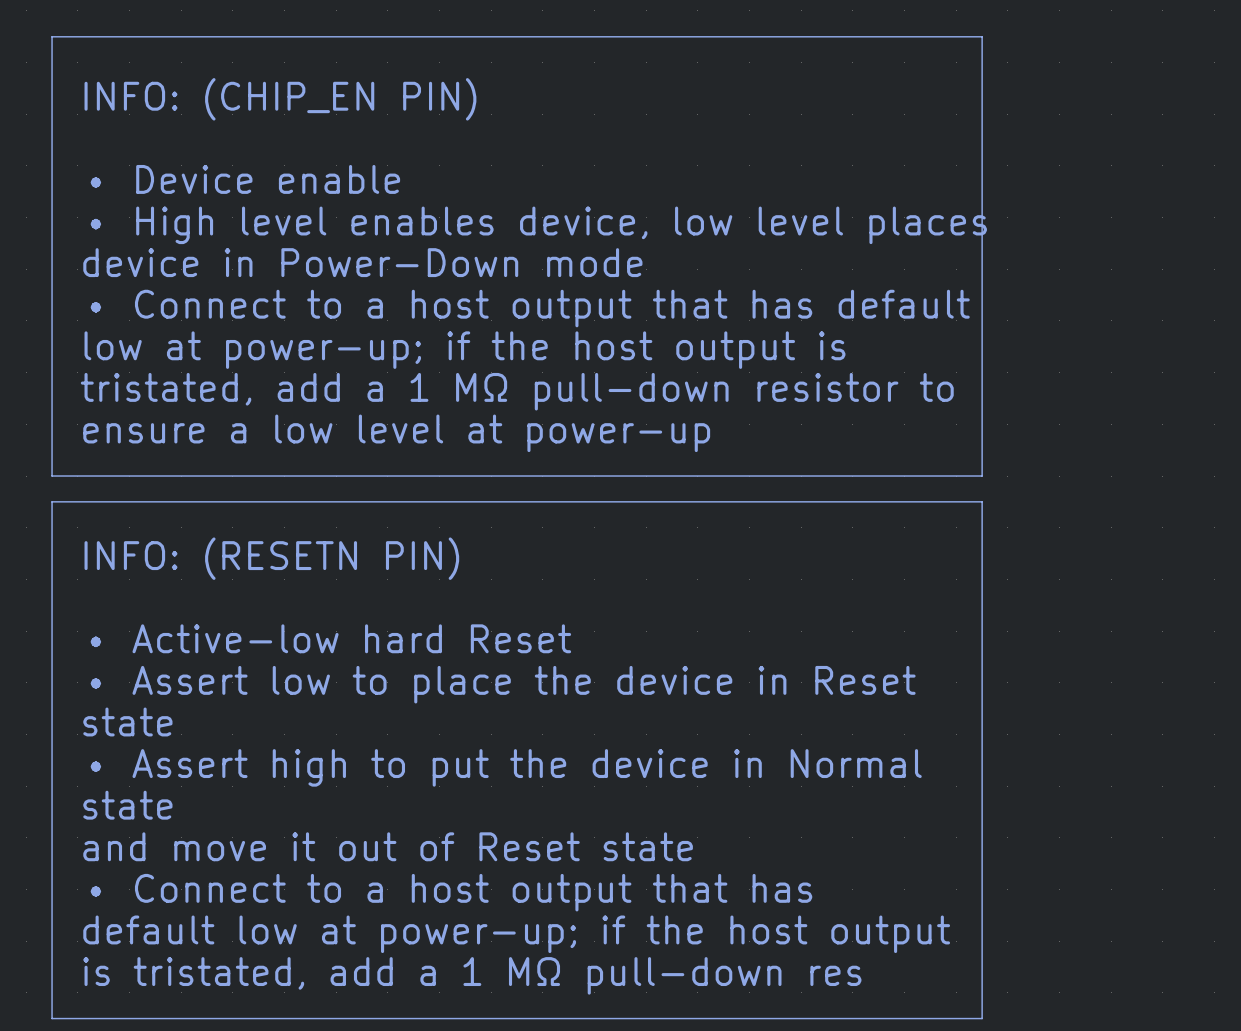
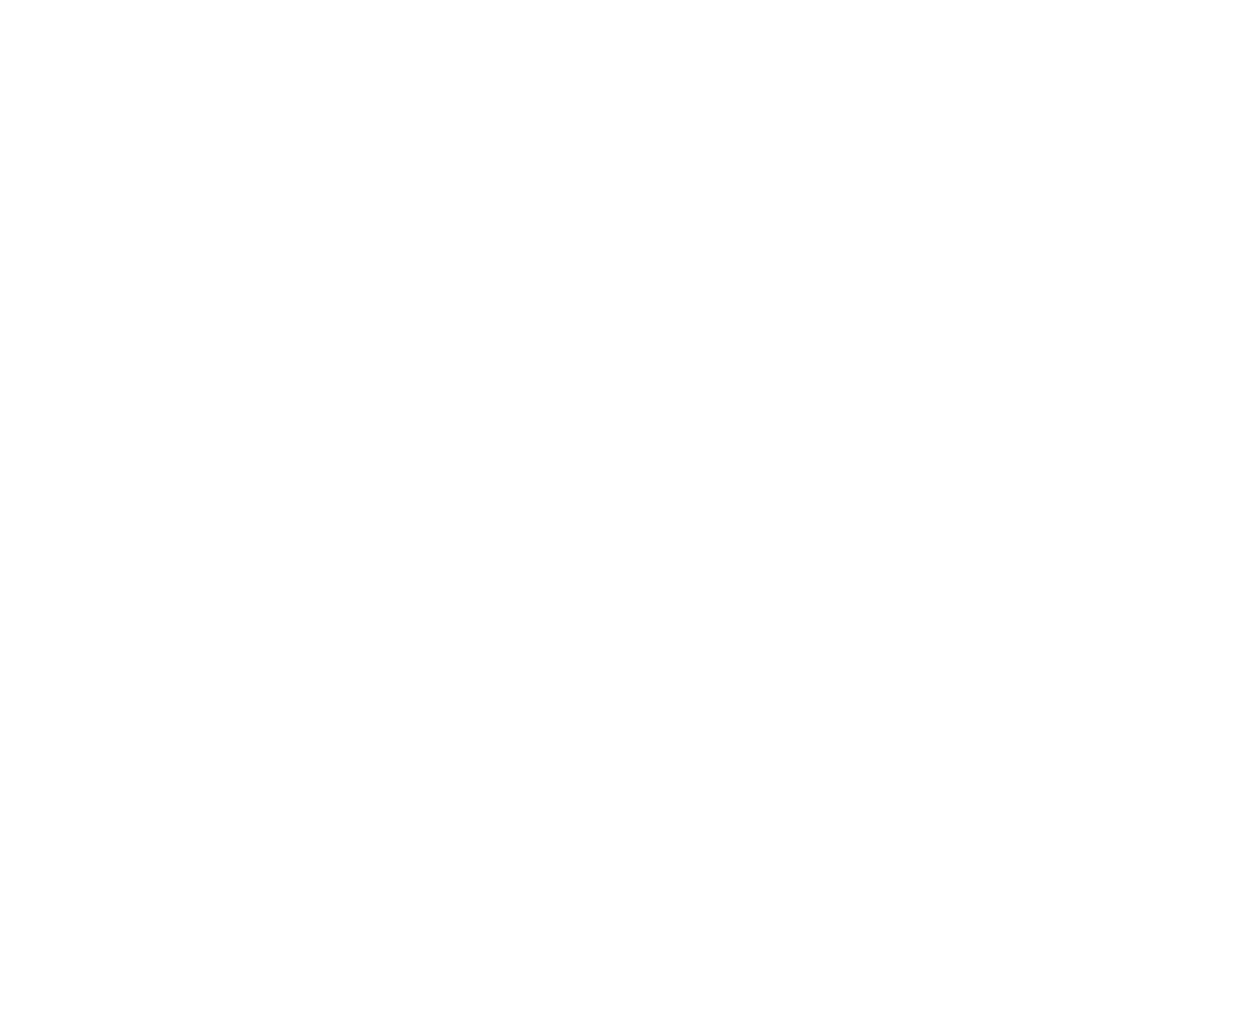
line: (52, 36) (52, 476) (982, 476) (982, 36) (52, 36) -> none
text: INFO: (CHIP_EN PIN) (280, 99) -> none
text: • Device enable (245, 179) -> none
text: • High level enables device, low level places (538, 225) -> none
text: device in Power-Down mode (362, 262) -> none
text: • Connect to a host output that has default (530, 308) -> none
text: low at power-up; if the host output is (464, 350) -> none
text: tristated, add a 1 MΩ pull-down resistor to (517, 391) -> none
text: ensure a low level at power-up (396, 433) -> none
line: (52, 501) (982, 501) (982, 1018) (52, 1018) (52, 501) -> none
text: INFO: (RESETN PIN) (271, 558) -> none
text: • Active-low hard Reset (330, 638) -> none
text: • Assert low to place the device in Reset (503, 684) -> none
text: state (127, 721) -> none
text: • Assert high to put the device in Normal (506, 767) -> none
text: state (127, 805) -> none
text: and move it out of Reset state (388, 846) -> none
text: • Connect to a host output that has (451, 892) -> none
text: default low at power-up; if the host output (516, 934) -> none
text: is tristated, add a 1 MΩ pull-down res (472, 975) -> none

